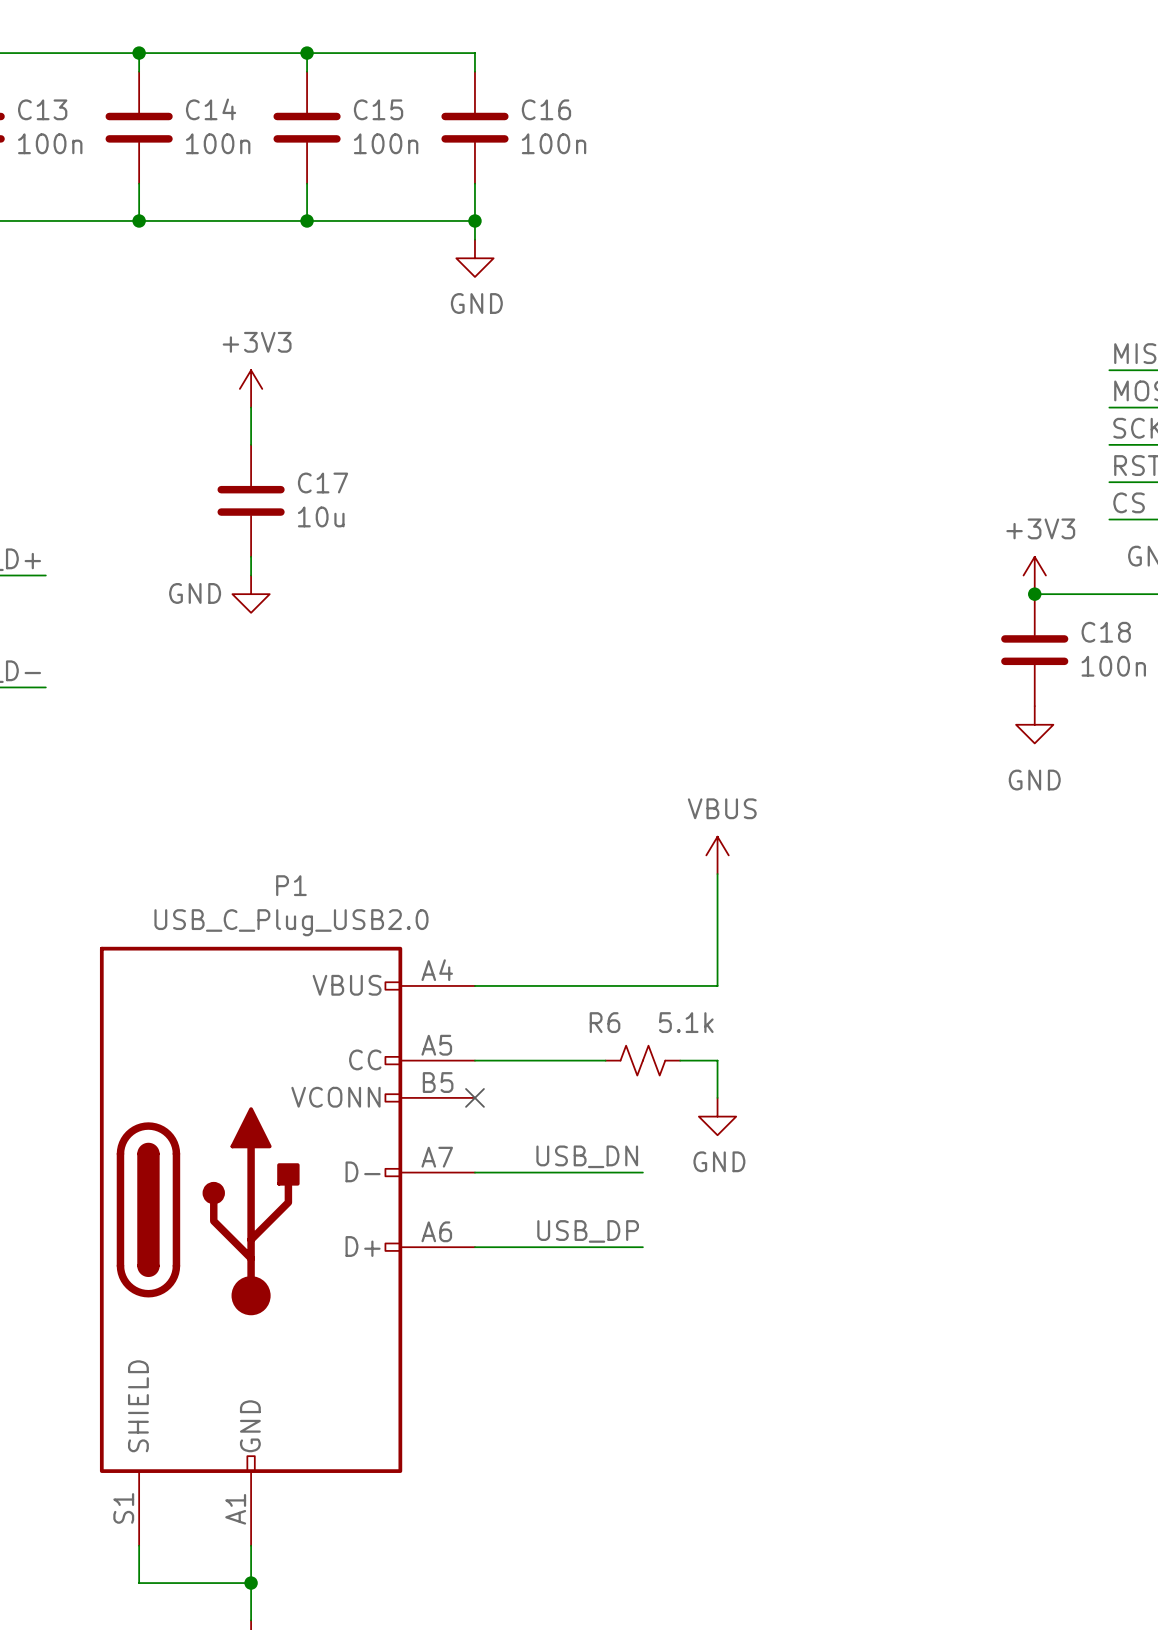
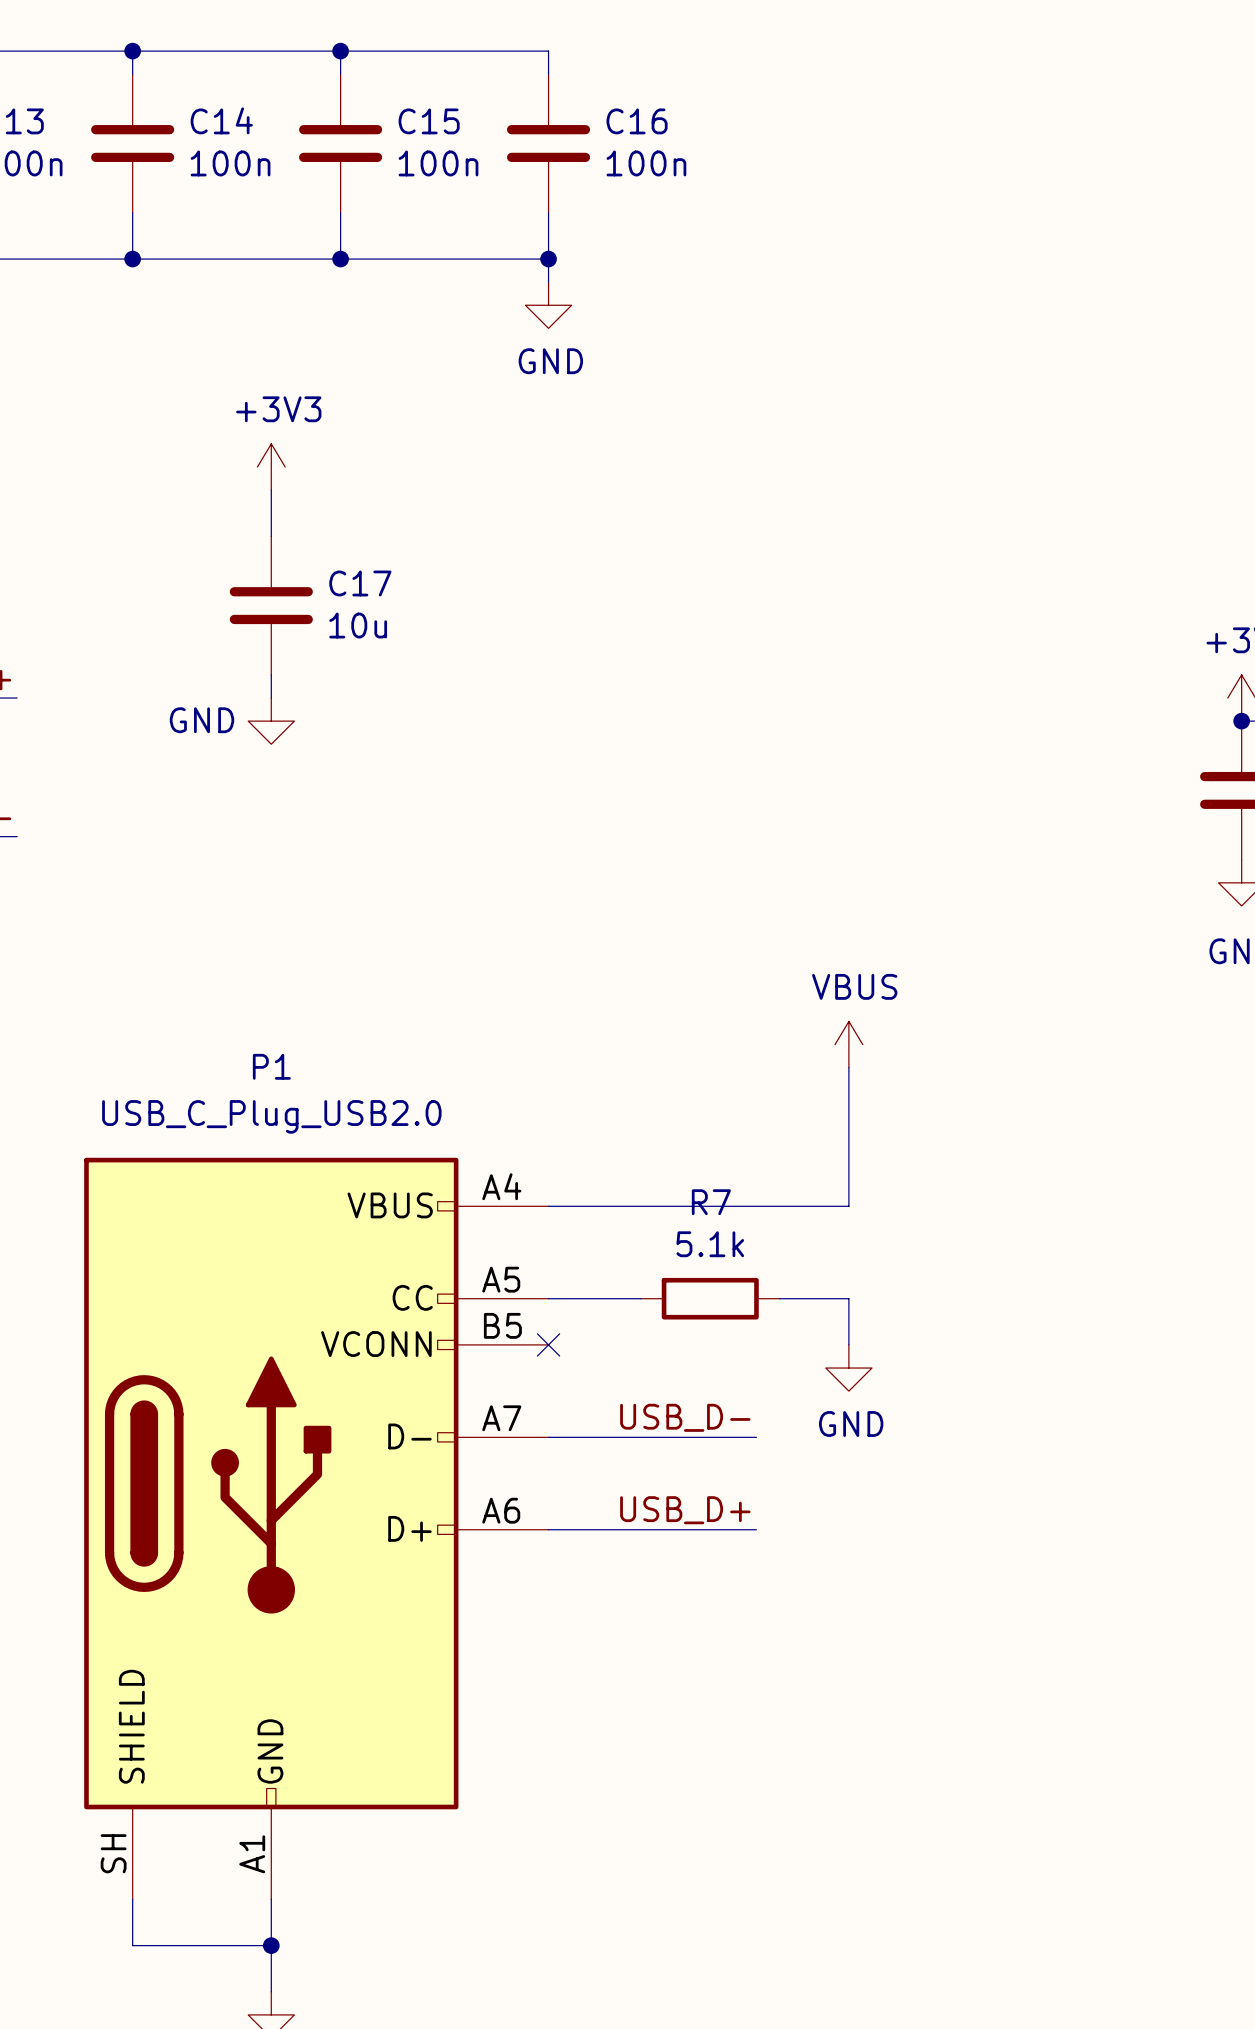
P1 name position: P1 (291, 885) -> P1 (271, 1066)
P1 value position: USB_C_Plug_USB2.0 (291, 922) -> USB_C_Plug_USB2.0 (271, 1116)
wire: (549, 1060) (605, 1060) -> none
R7: none -> 5.1k (710, 1298)
R6: 5.1k (642, 1060) -> none
label: USB_DN (587, 1156) -> USB_D- (685, 1417)
label: USB_DP (588, 1231) -> USB_D+ (685, 1510)
P1 pin number: S1 (123, 1508) -> SH (113, 1853)

